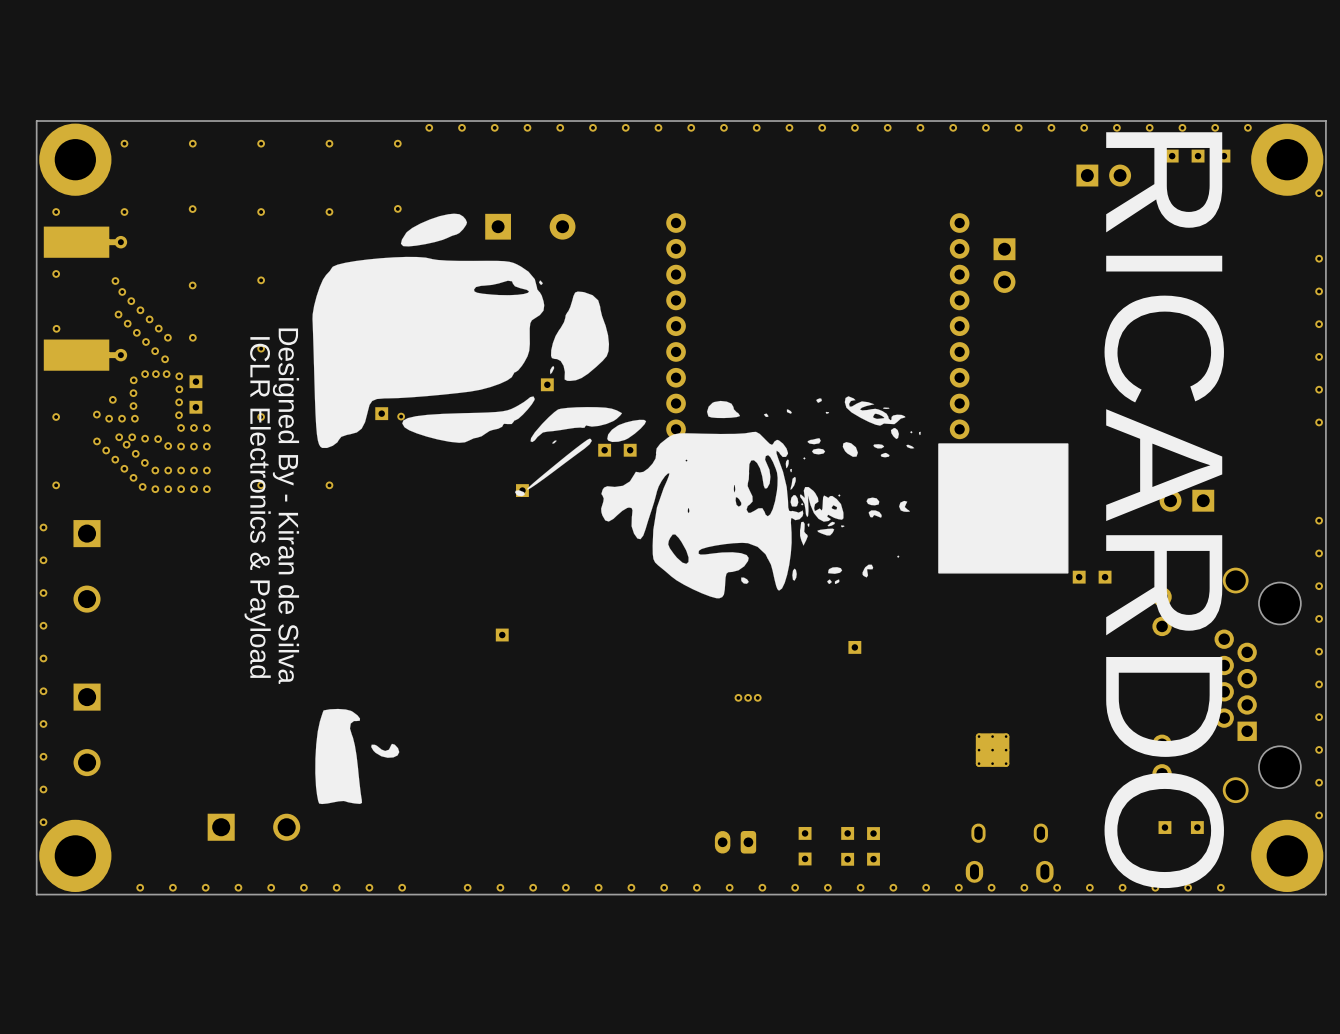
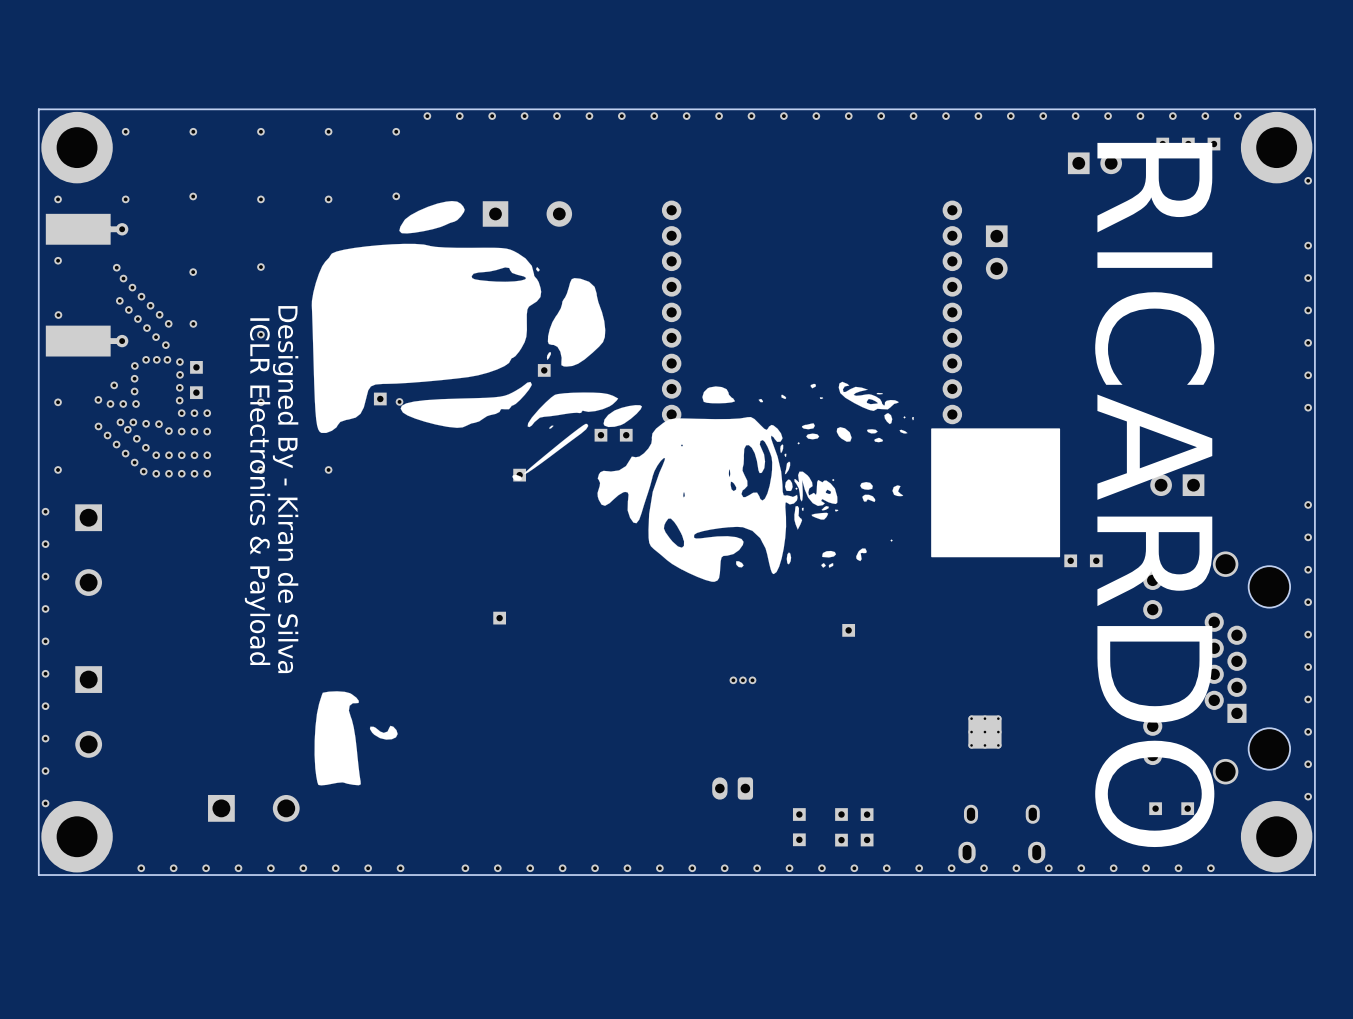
part position: (735, 842) -> (732, 788)

